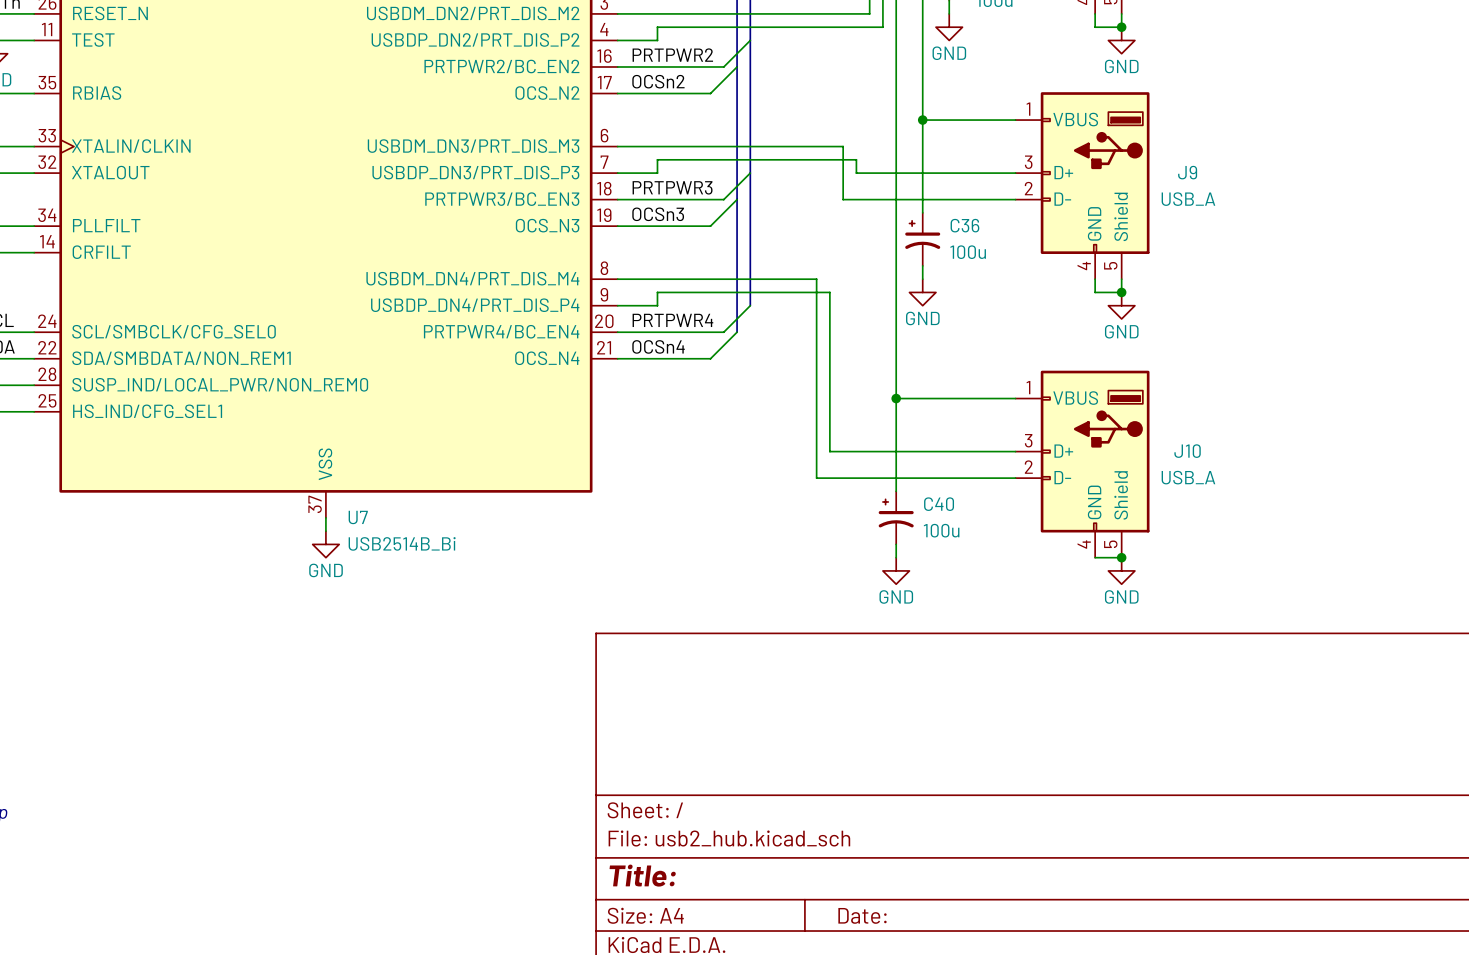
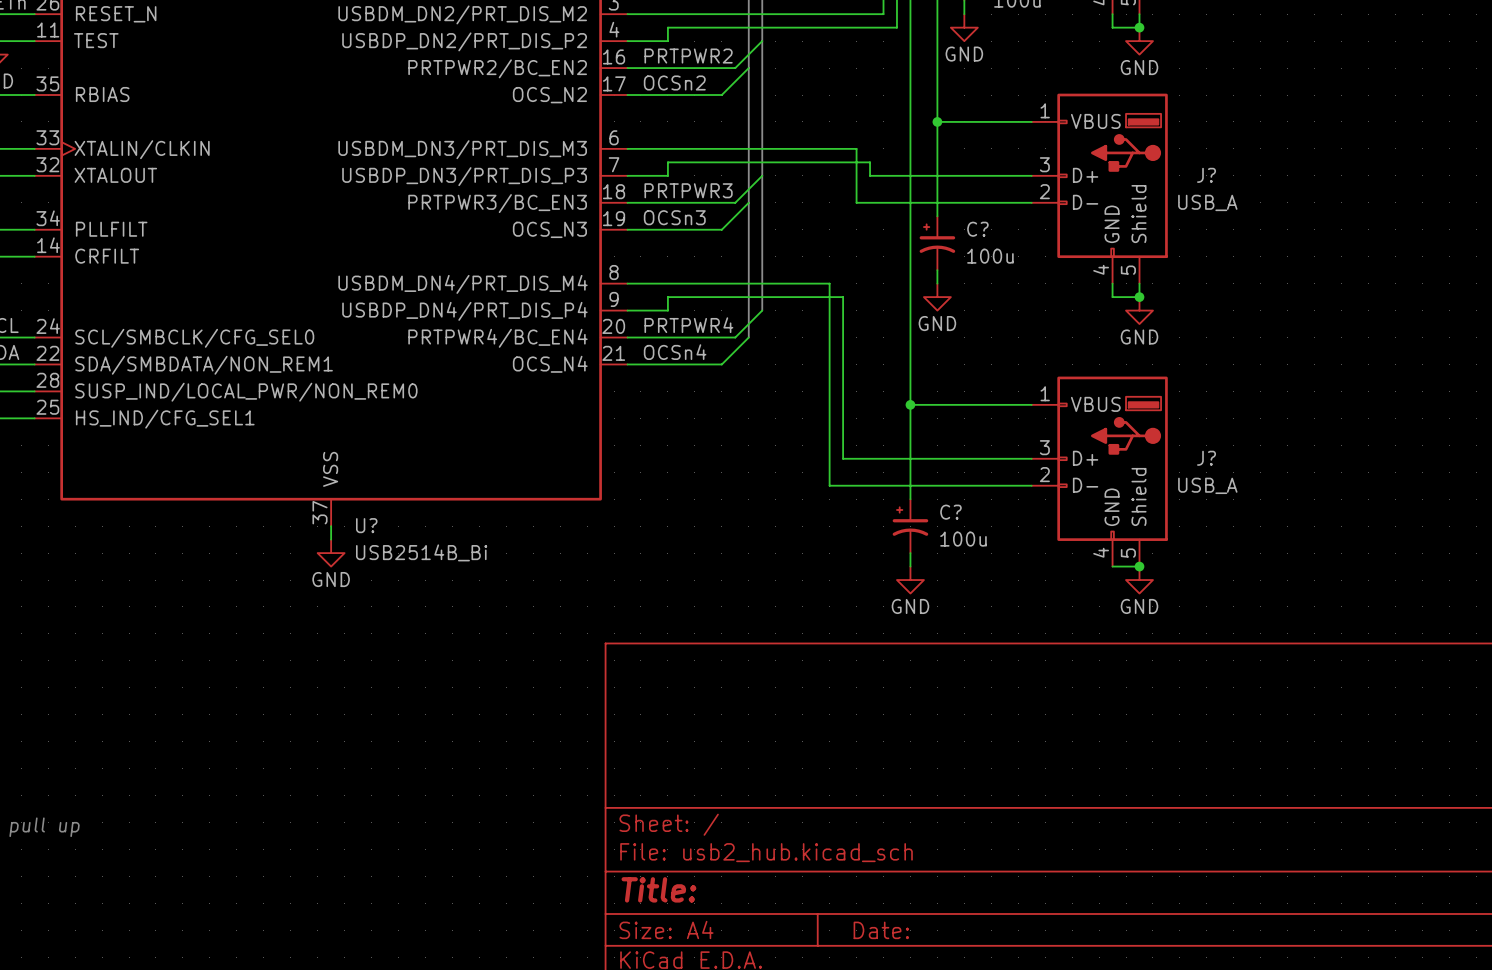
J9 name: J9 (1187, 172) -> J? (1206, 175)
C36 name: C36 (964, 225) -> C? (977, 229)
J10 name: J10 (1187, 451) -> J? (1206, 458)
C40 name: C40 (939, 504) -> C? (950, 512)
U7 name: U7 (358, 517) -> U? (366, 525)

